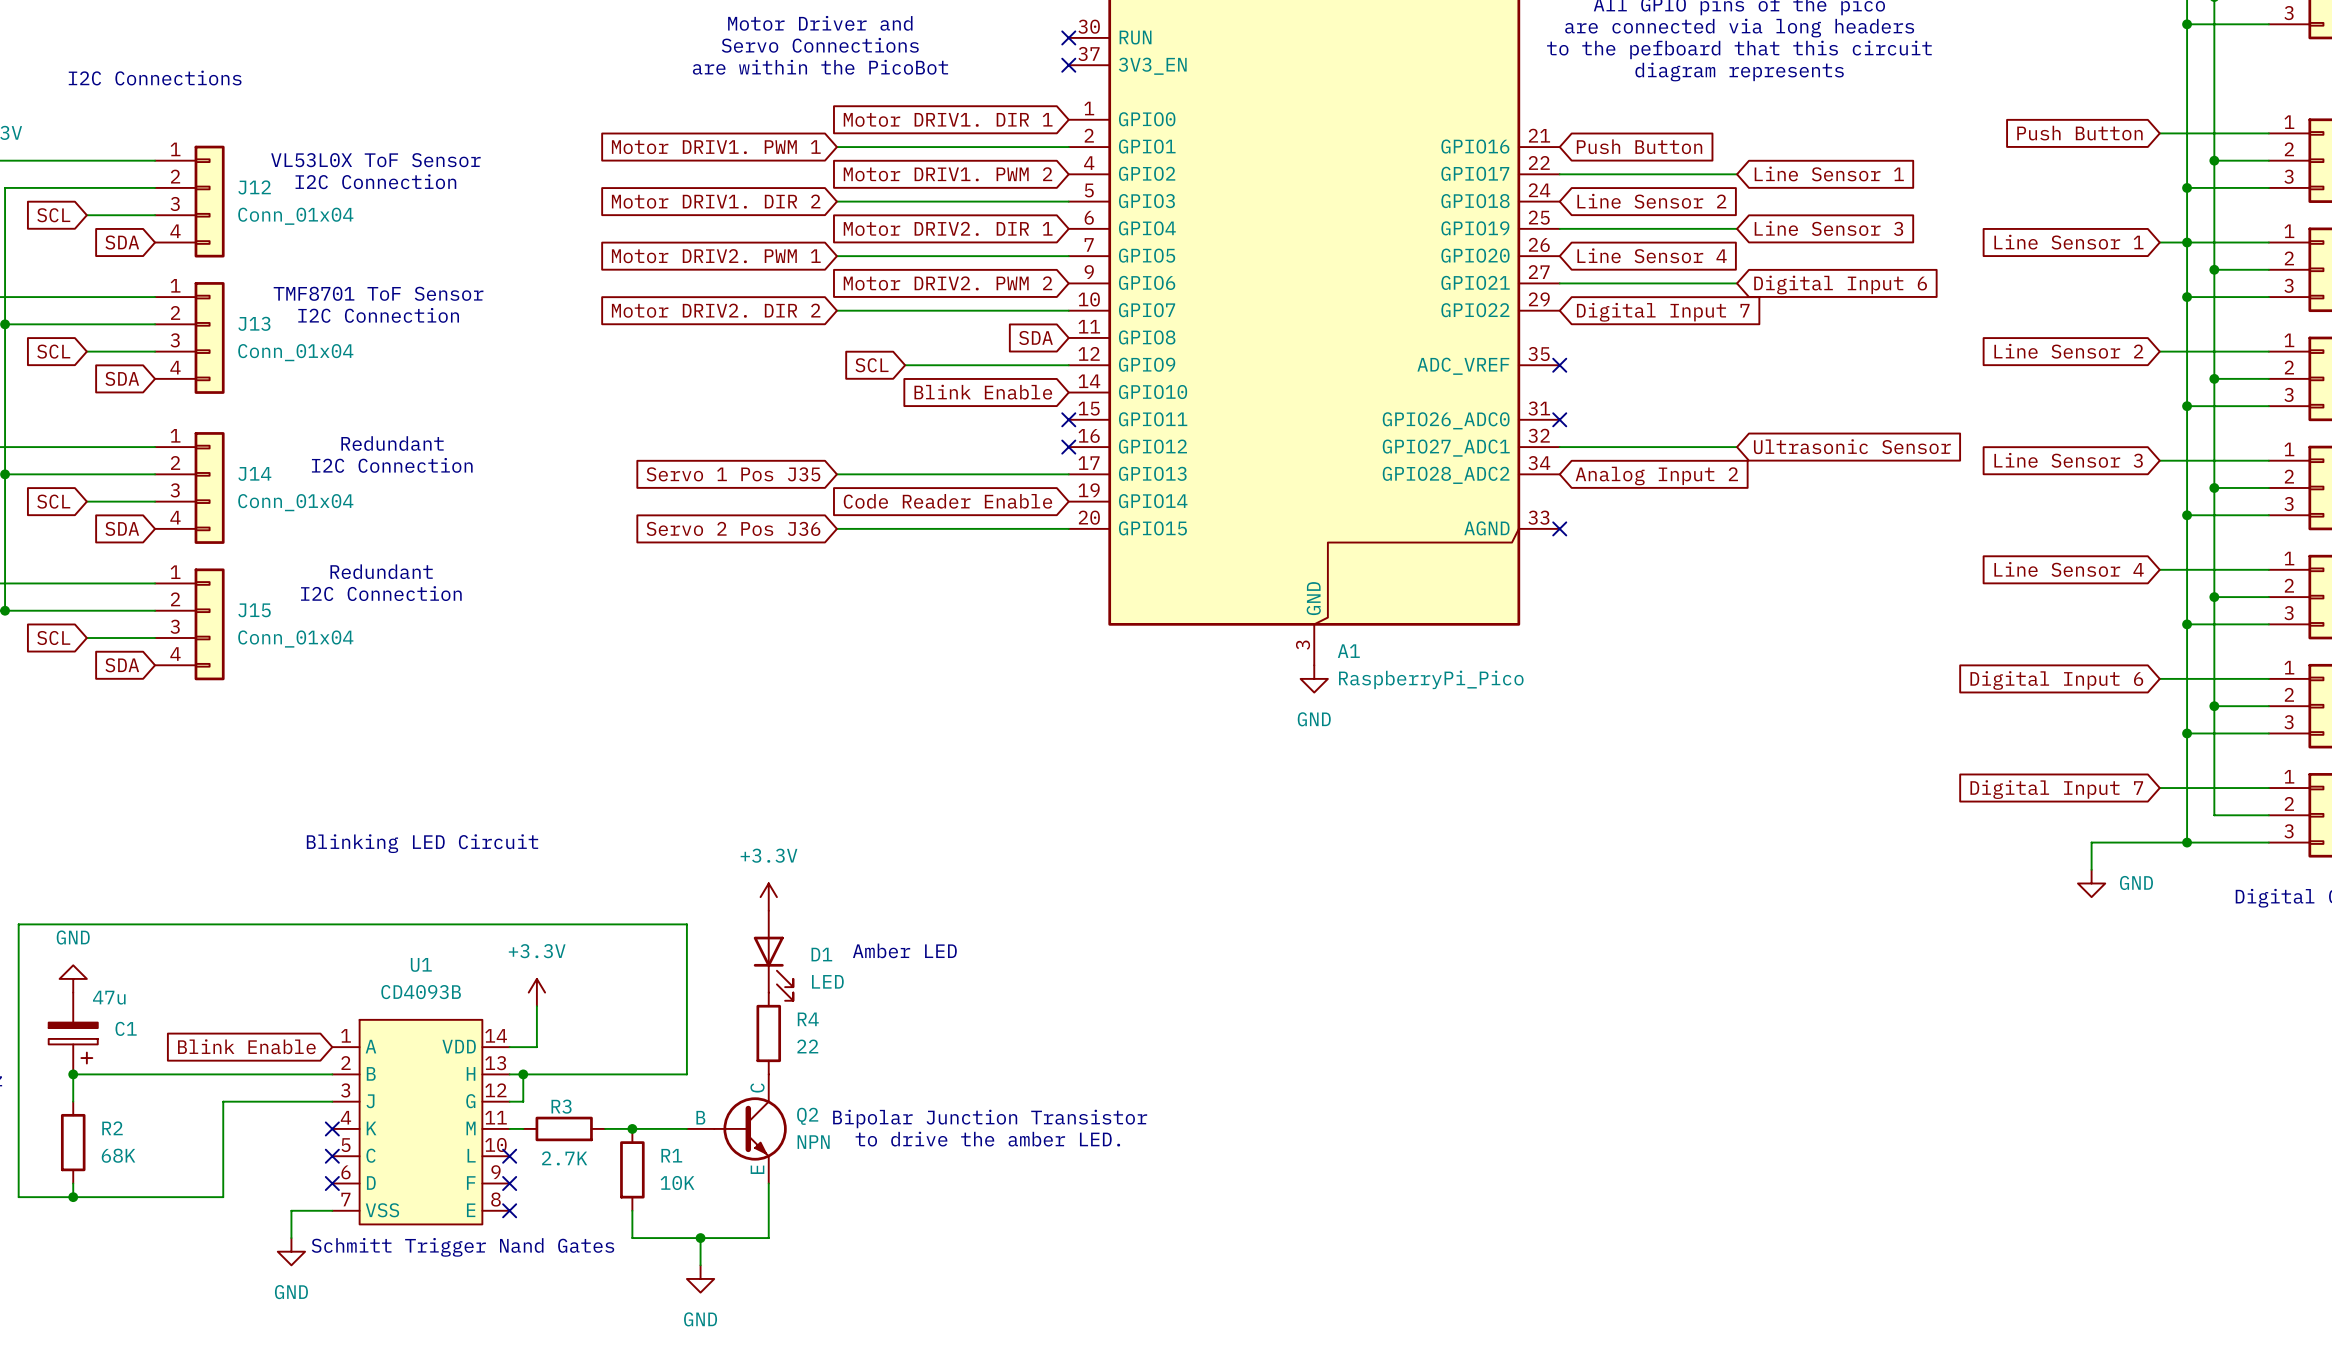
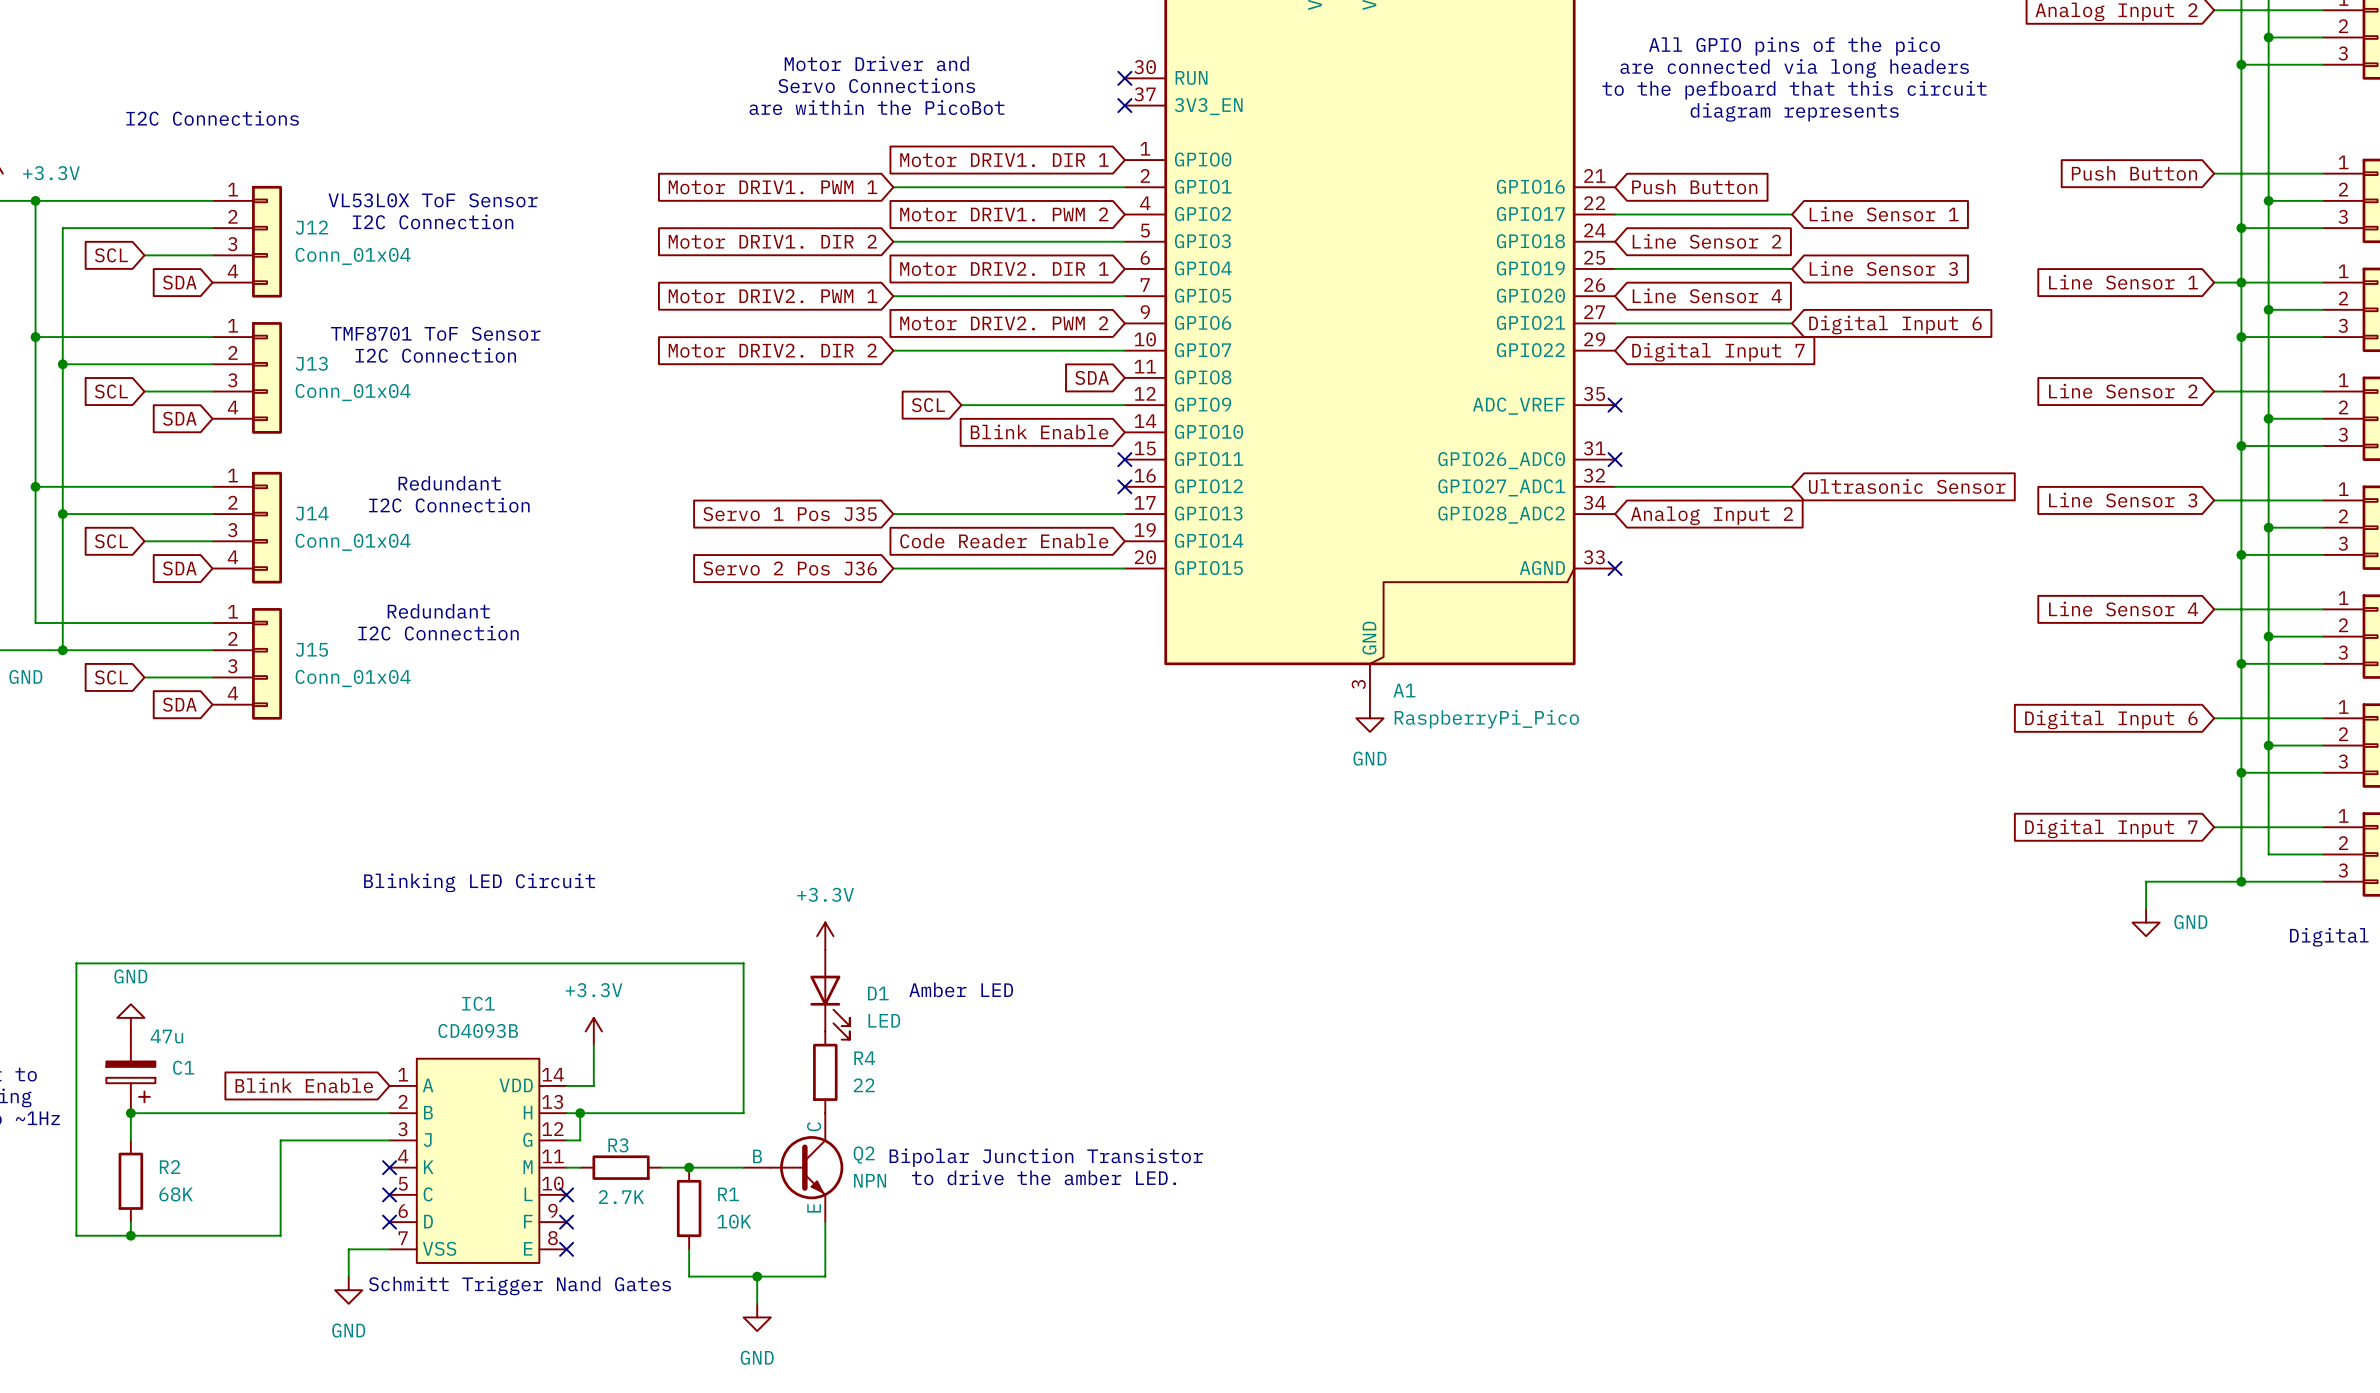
U1 name: U1 (421, 964) -> IC1 (478, 1003)

